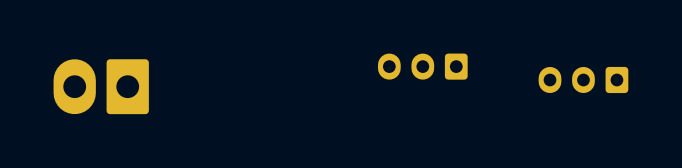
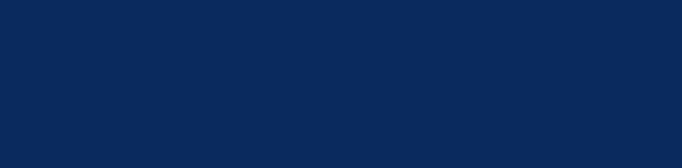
part: (422, 66) -> none
part: (583, 79) -> none
part: (101, 86) -> none

